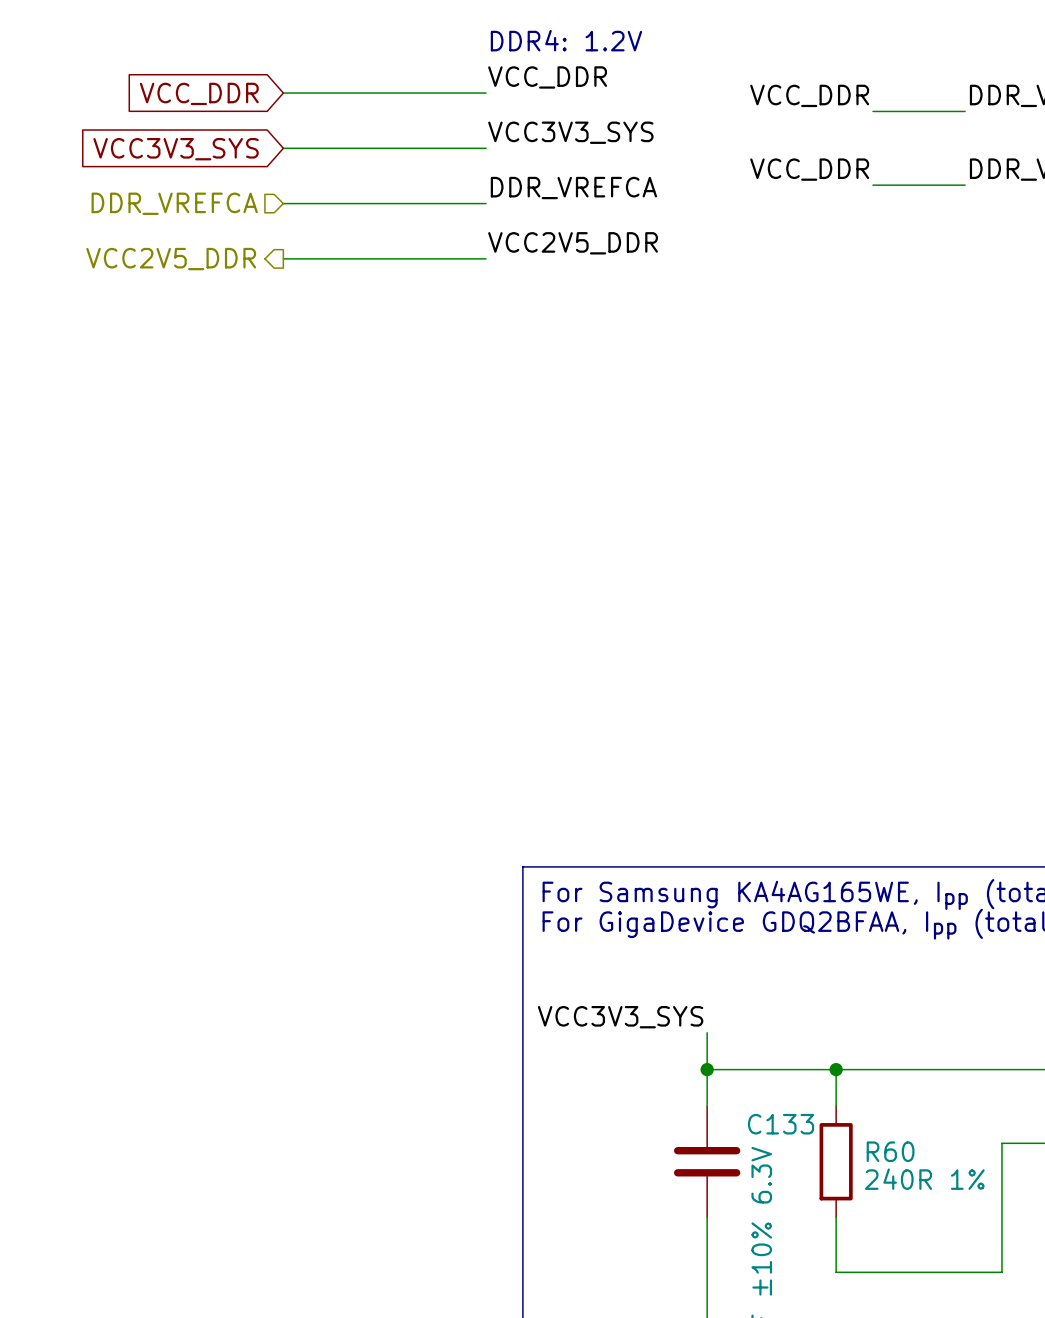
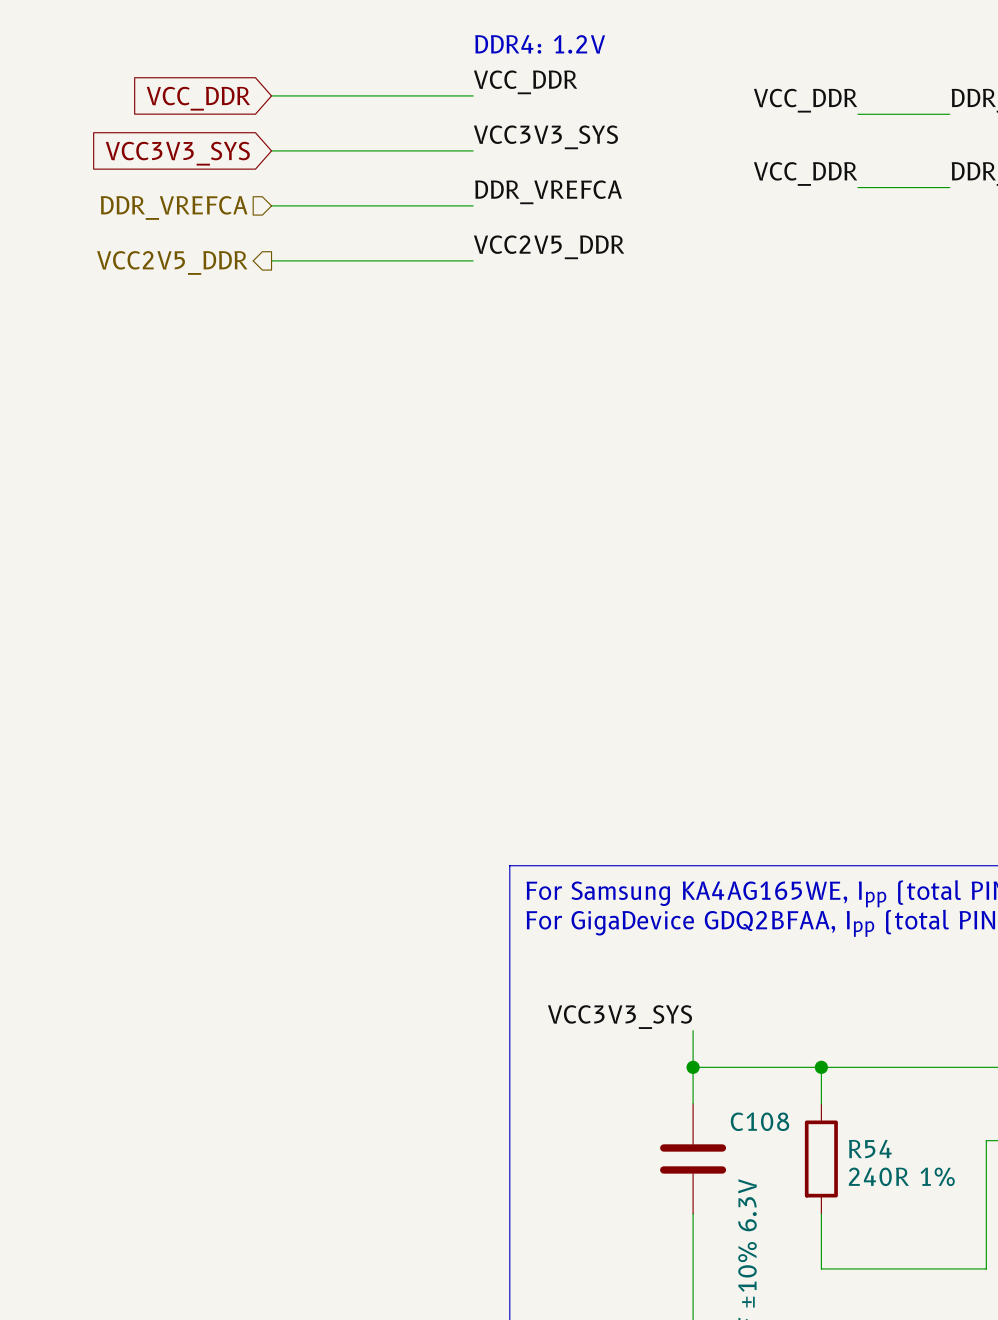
C133 name: C133 (780, 1124) -> C108 (760, 1121)
R60 name: R60 (890, 1151) -> R54 (870, 1149)

